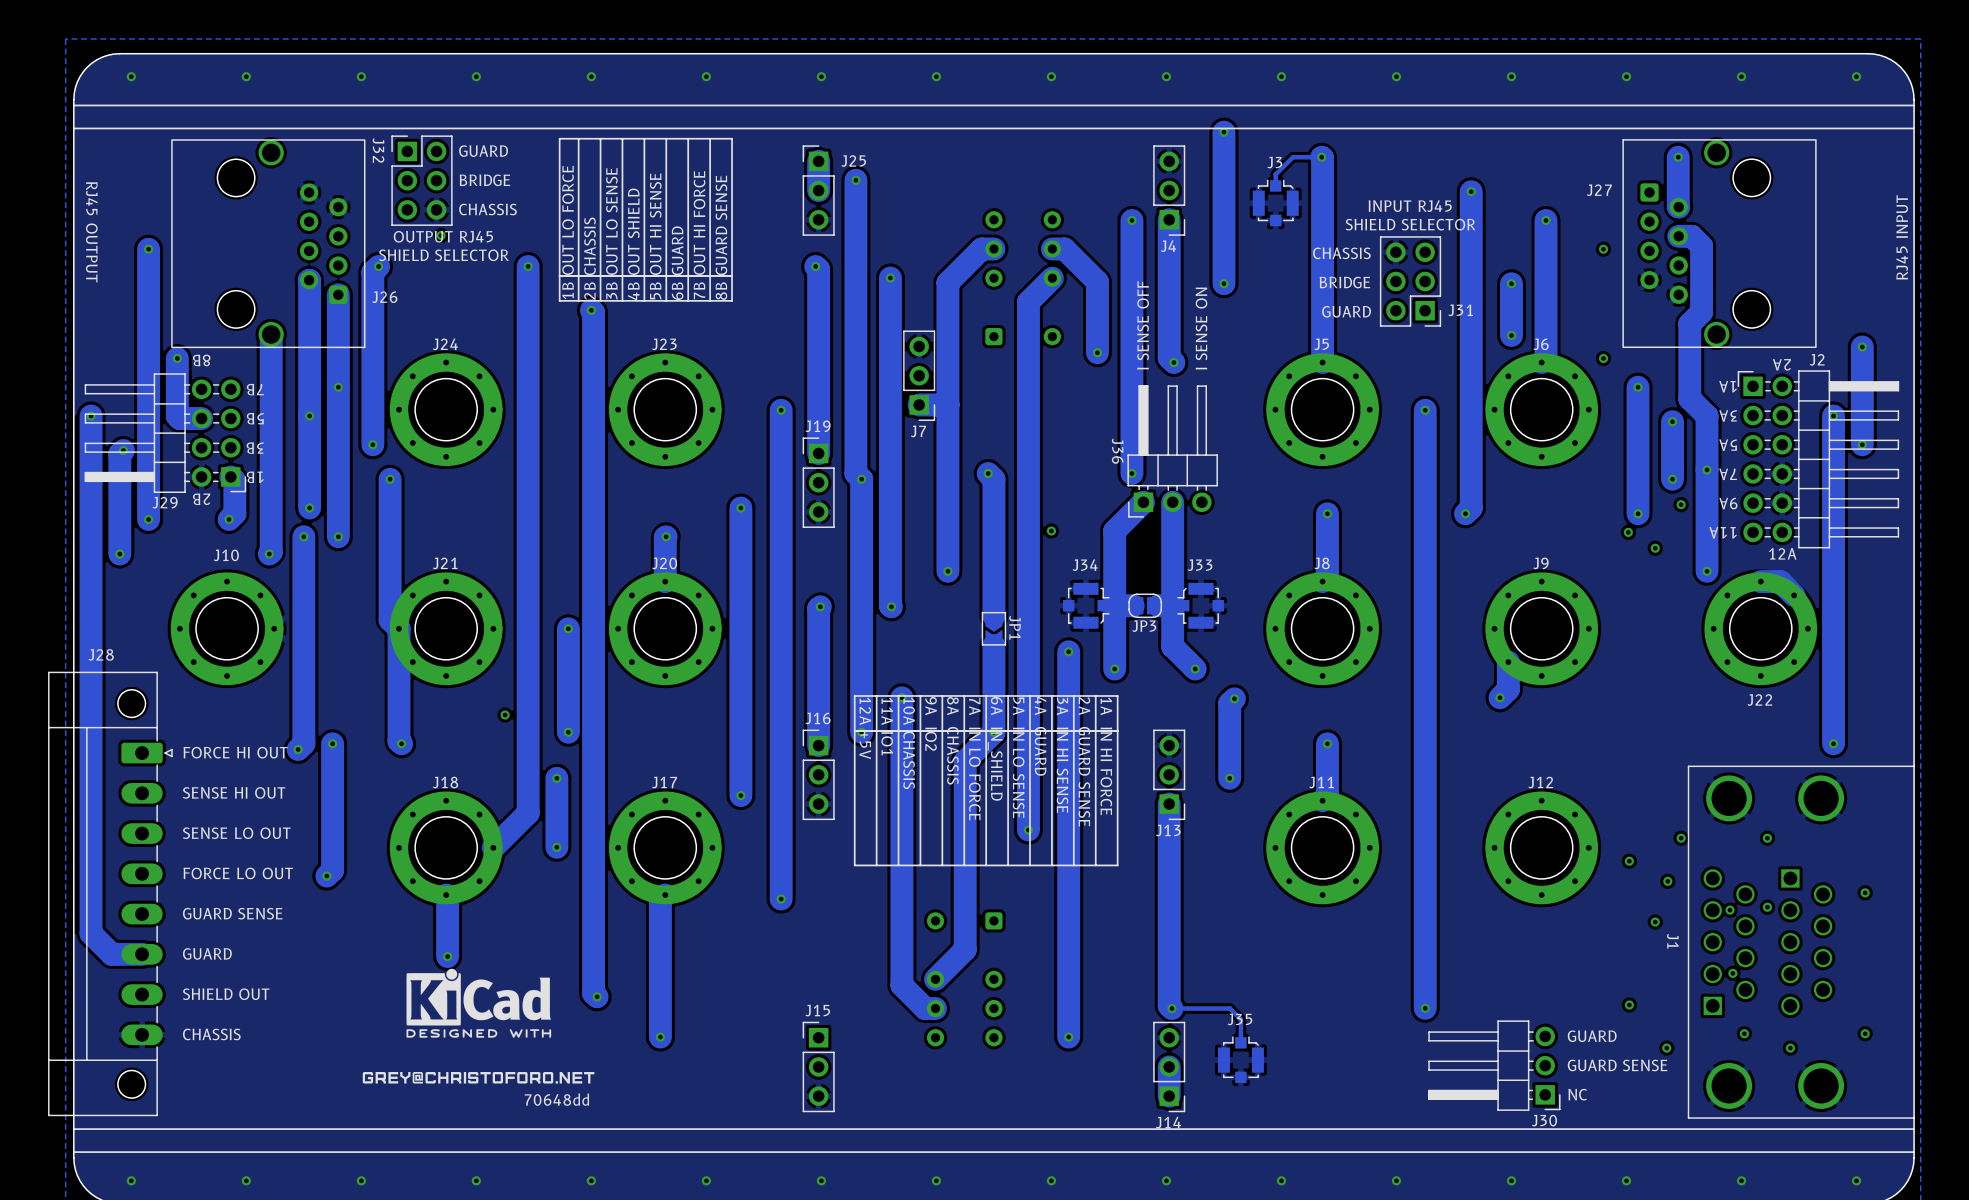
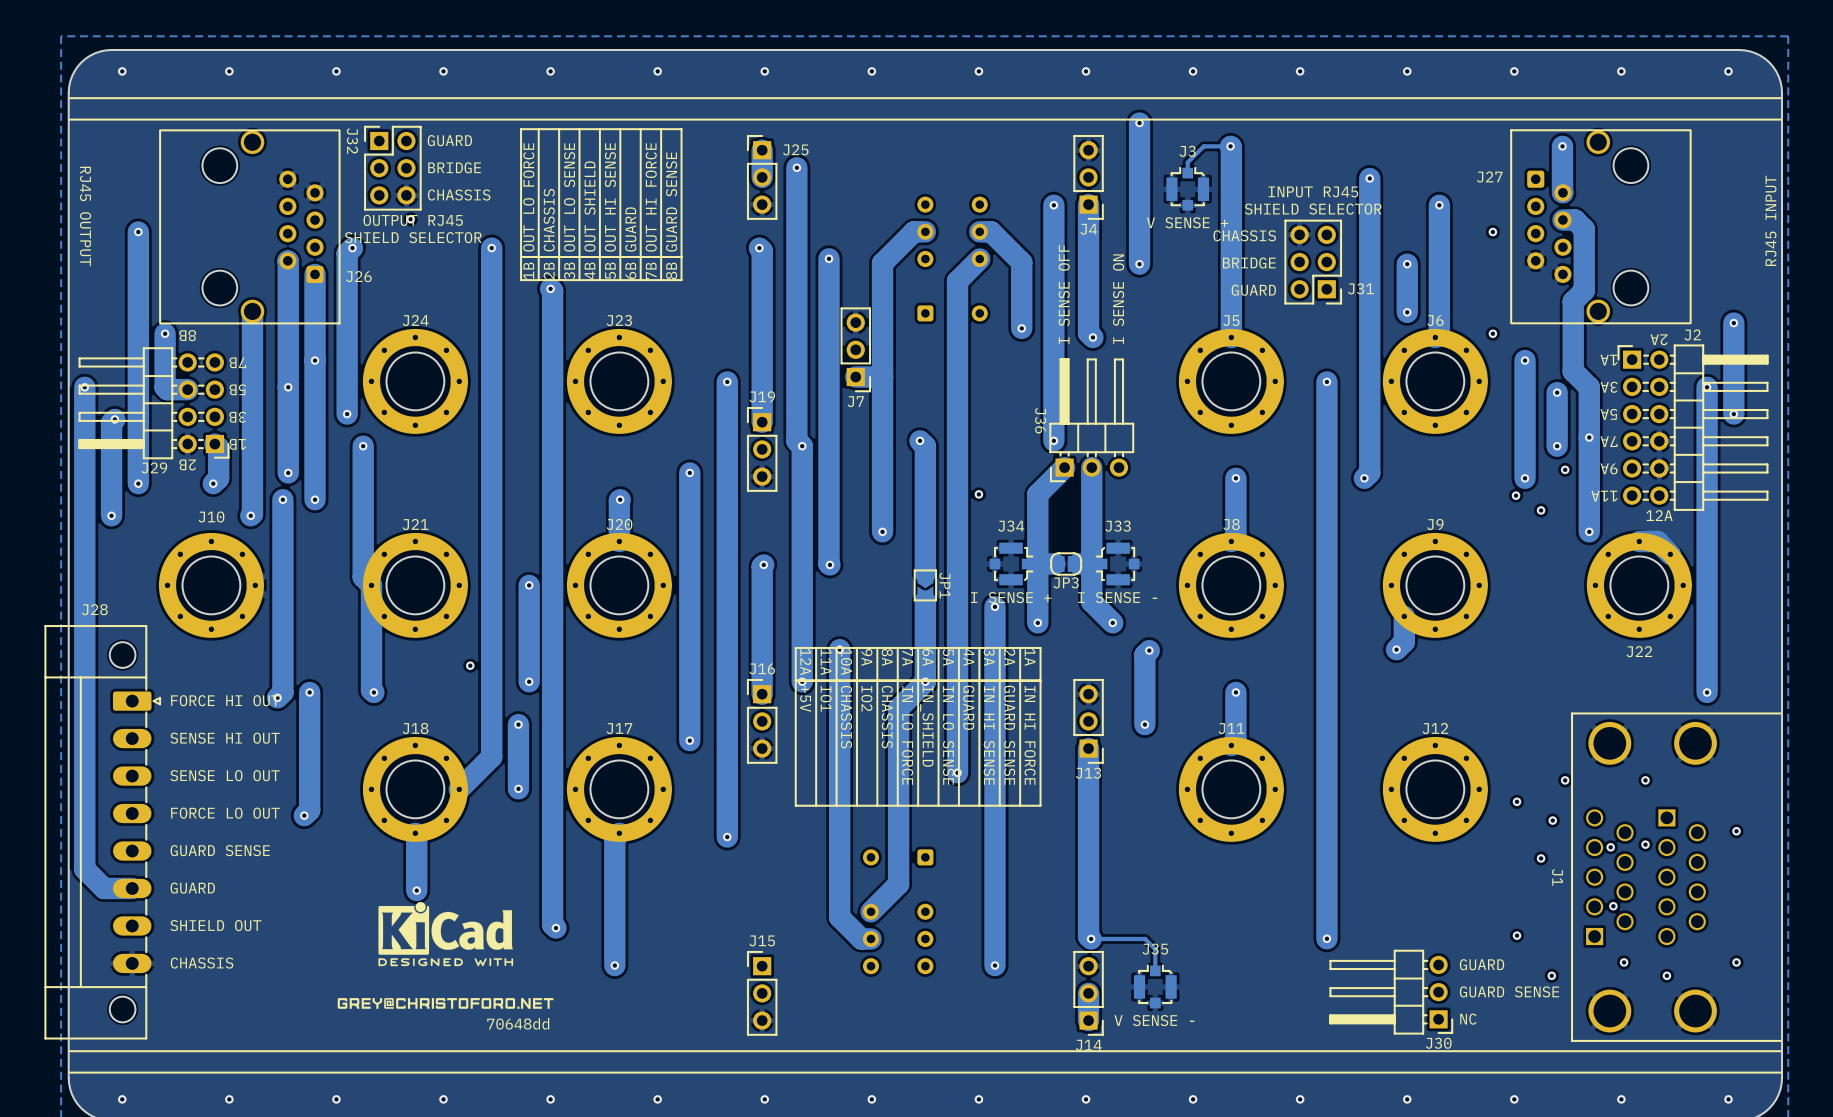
text: none -> V SENSE + (1187, 222)
text: none -> I SENSE + (1011, 597)
text: none -> I SENSE - (1117, 597)
text: none -> V SENSE - (1154, 1020)

